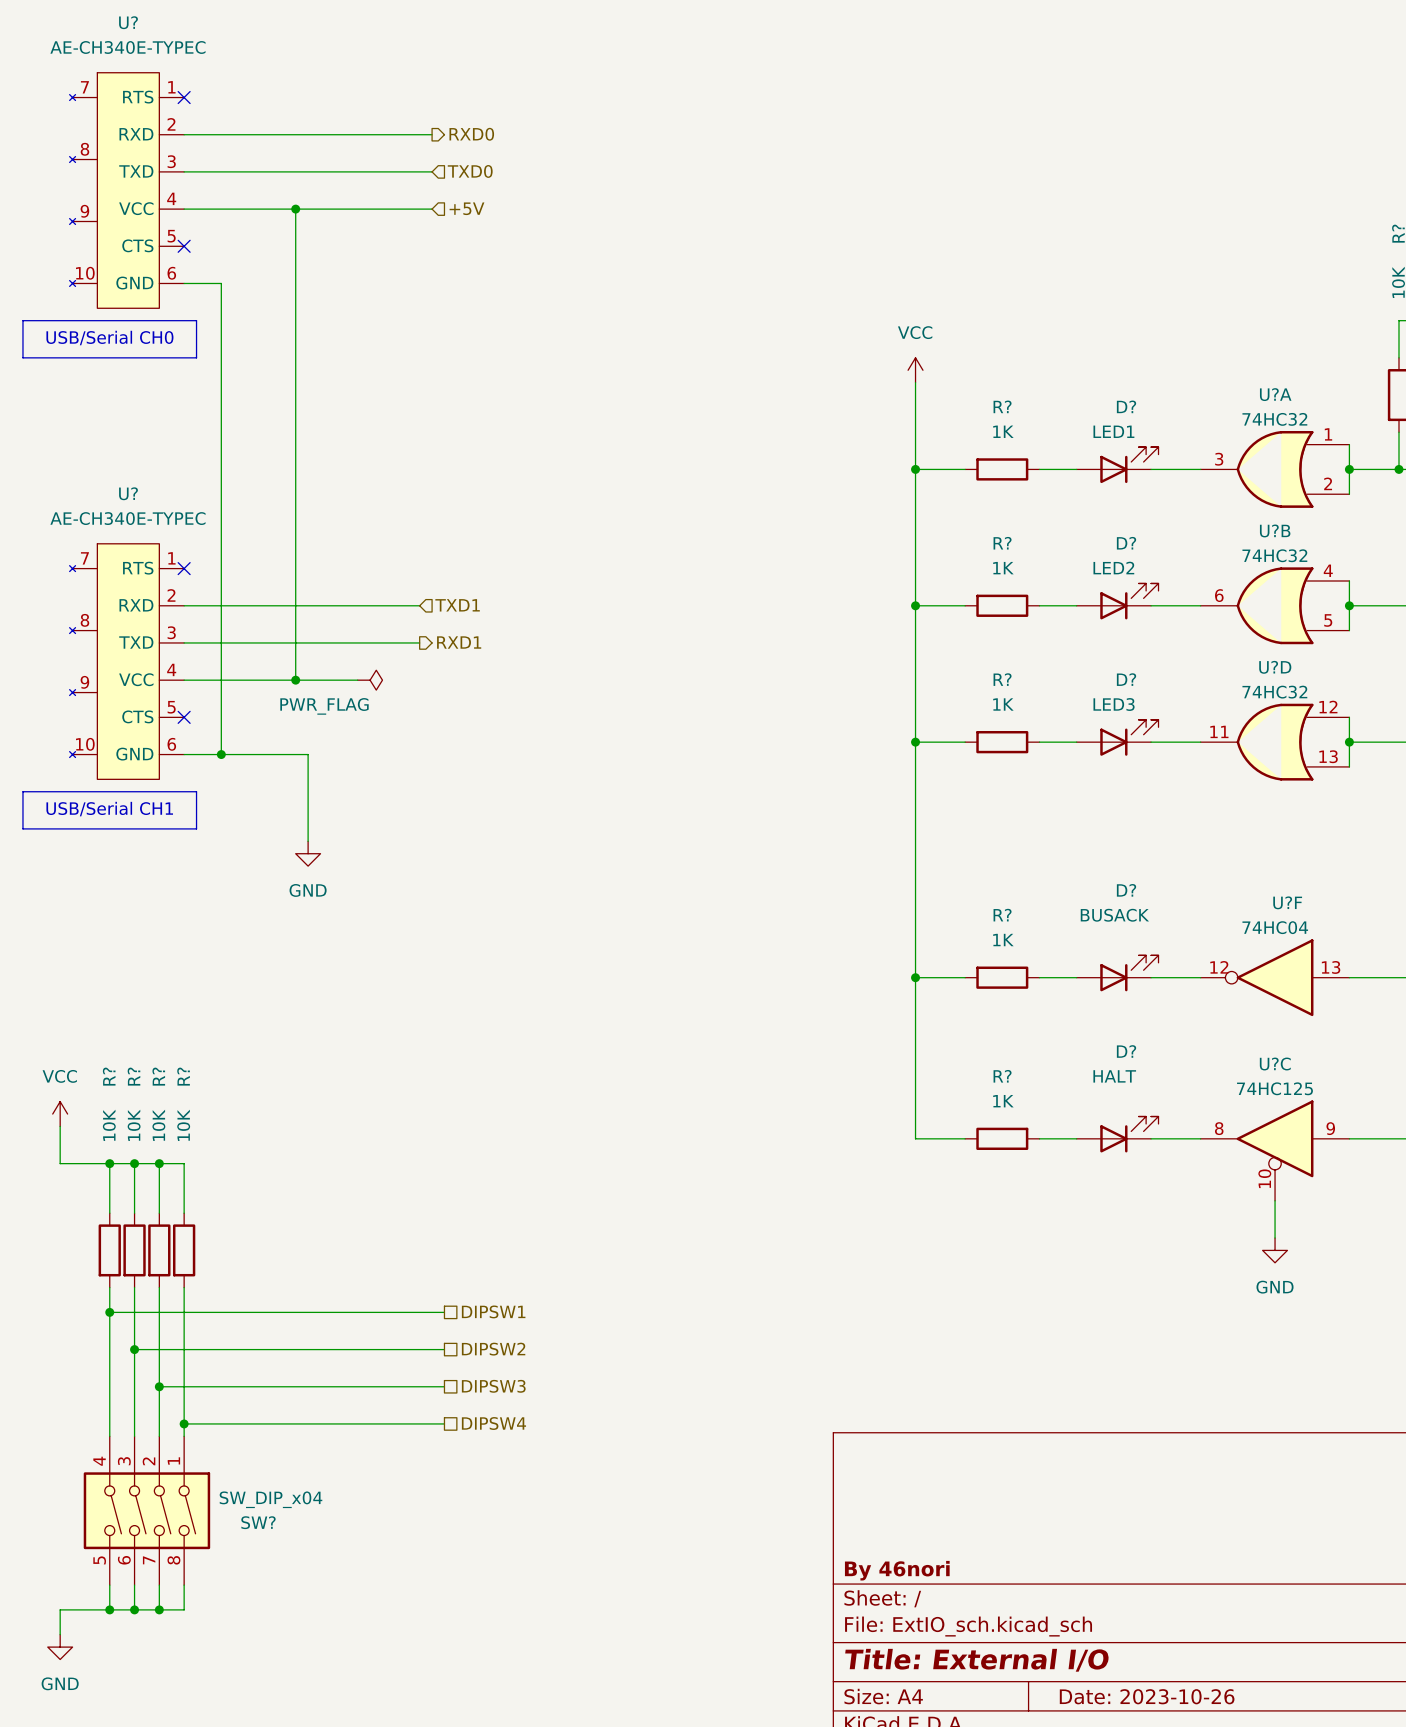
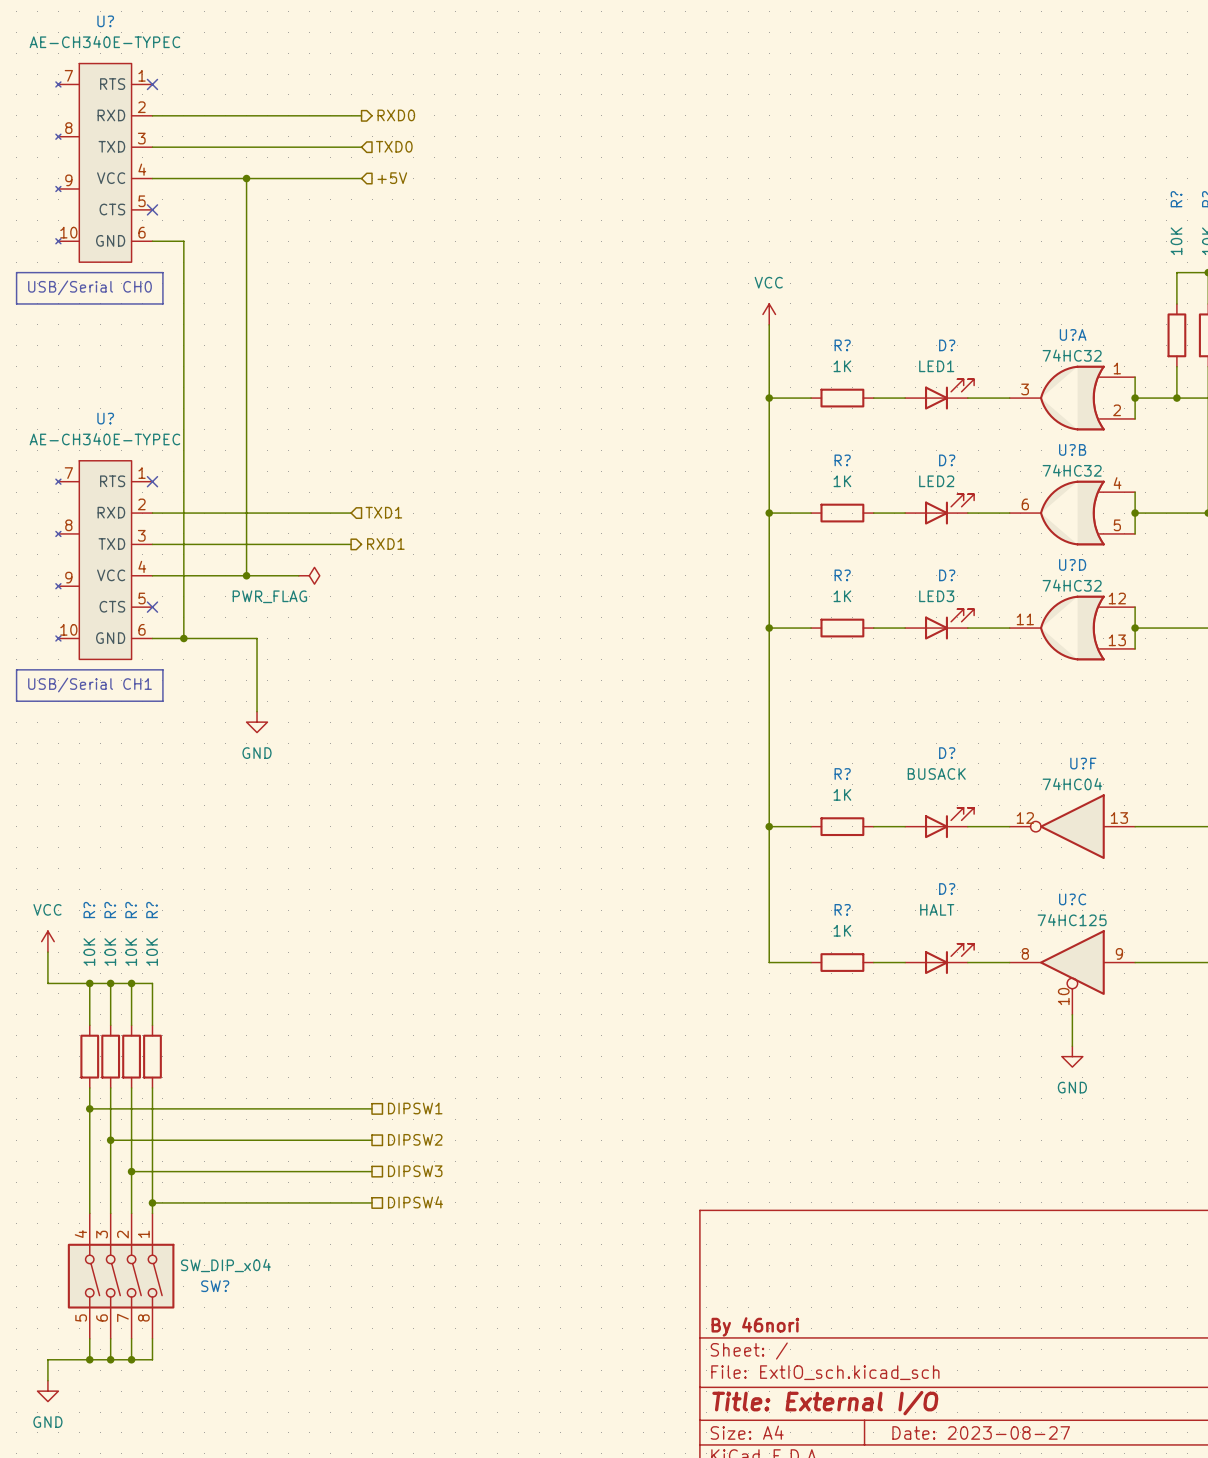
title block: Date: 2023-10-26 (1147, 1696) -> Date: 2023-08-27 (981, 1432)

